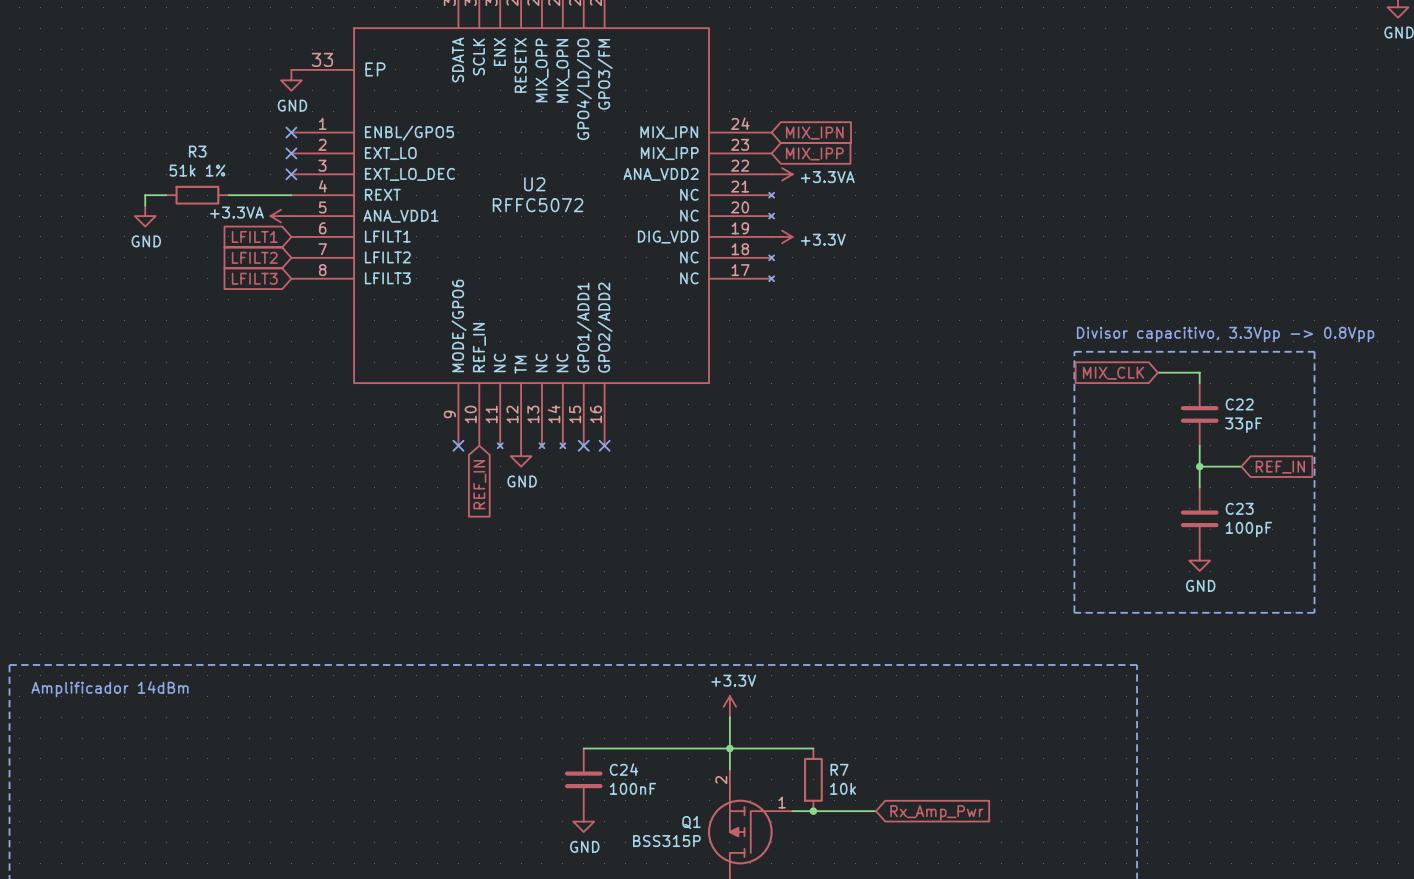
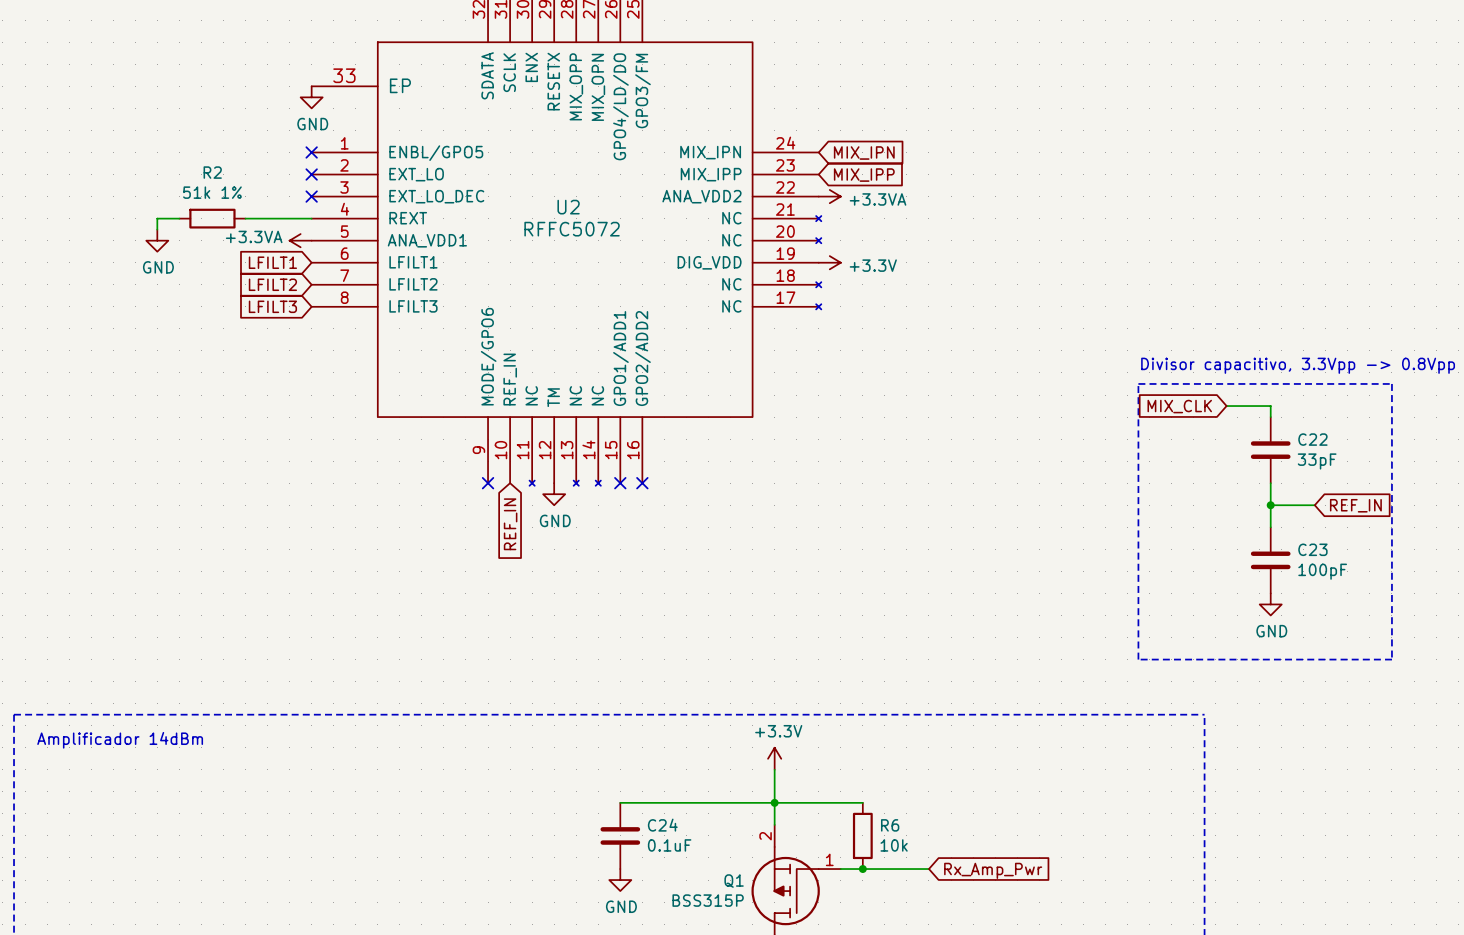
R3 name: R3 (197, 151) -> R2 (212, 172)
R7 name: R7 (839, 769) -> R6 (890, 825)
C24 value: 100nF (632, 788) -> 0.1uF (669, 845)

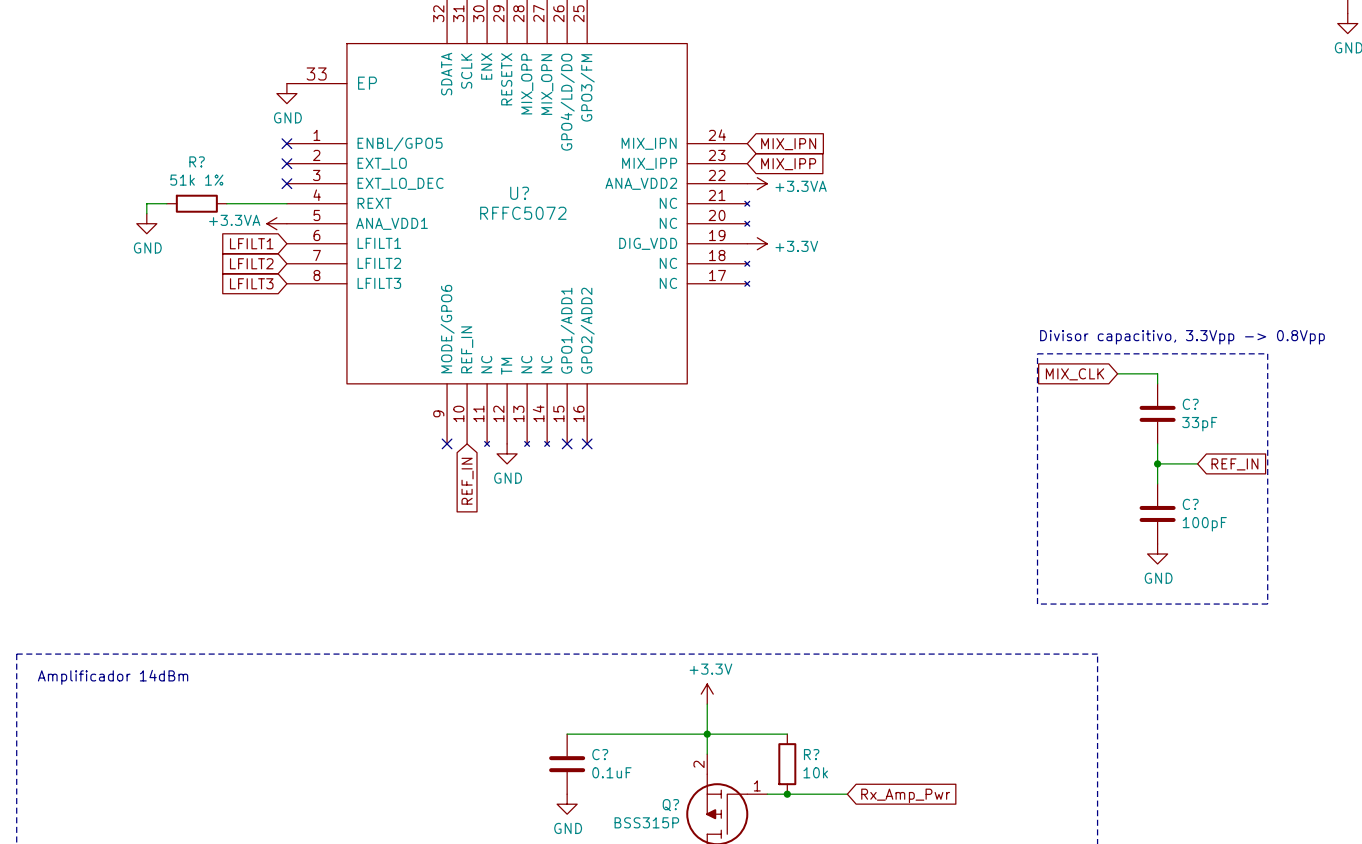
R2 name: R2 (212, 172) -> R? (197, 161)
U2 name: U2 (568, 207) -> U? (519, 193)
C22 name: C22 (1312, 439) -> C? (1190, 404)
C23 name: C23 (1312, 549) -> C? (1190, 504)
C24 name: C24 (662, 825) -> C? (600, 754)
R6 name: R6 (890, 825) -> R? (811, 754)
Q1 name: Q1 (734, 881) -> Q? (670, 805)

